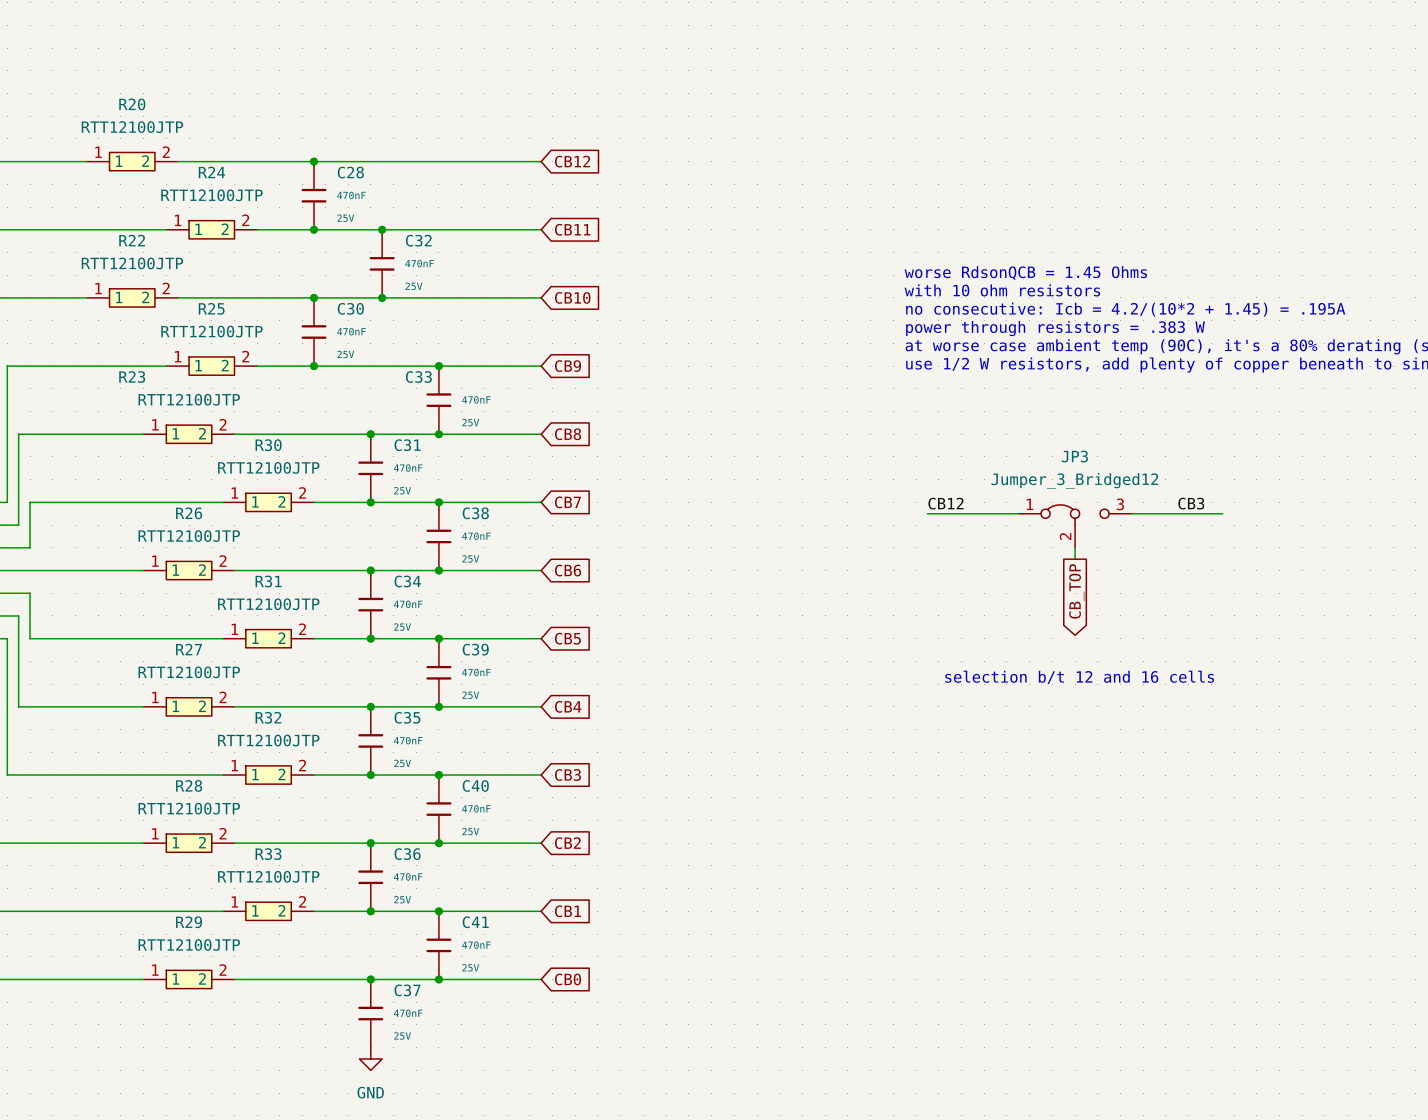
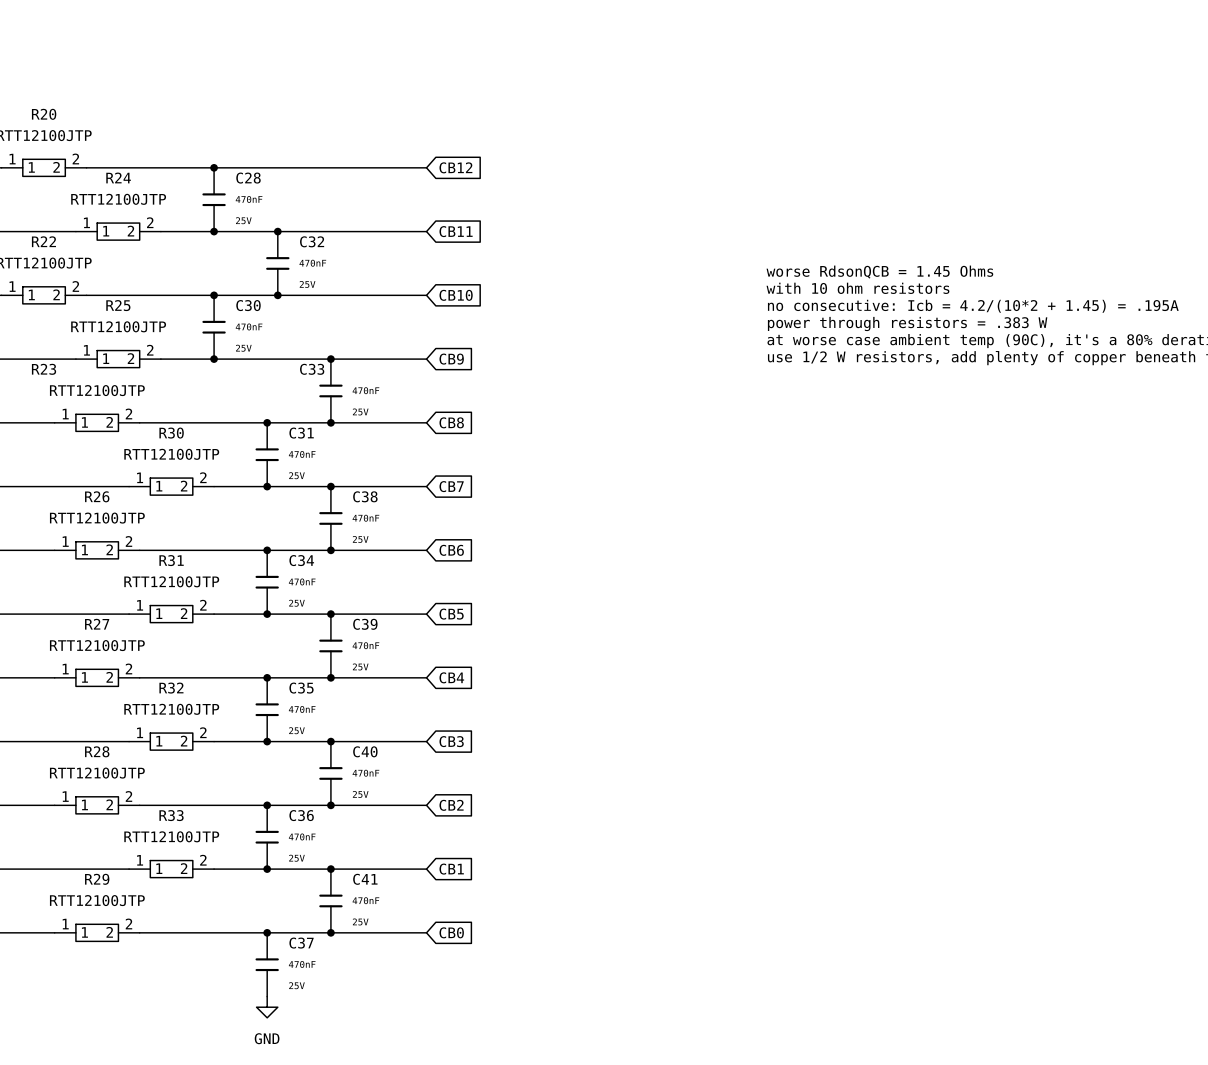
label: CB12 (946, 503) -> none
label: CB3 (1191, 503) -> none
wire: (927, 513) (1018, 513) -> none
wire: (1131, 513) (1222, 513) -> none
JP3: Jumper_3_Bridged12 (1075, 526) -> none
wire: (1075, 547) (1075, 559) -> none
global label: CB_TOP (1076, 591) -> none
text: selection b/t 12 and 16 cells (1079, 677) -> none

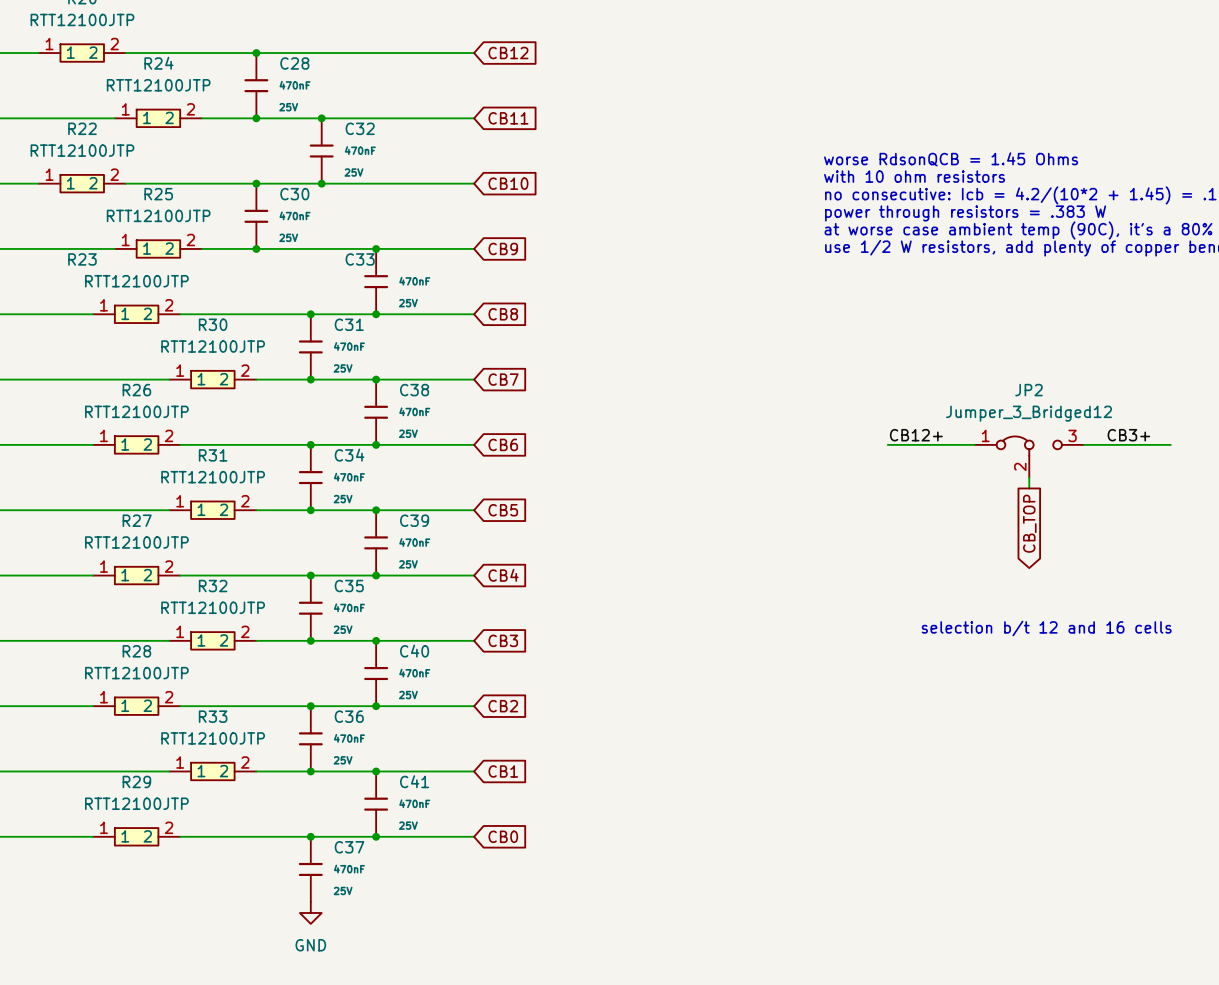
label: none -> CB12+ (916, 435)
label: none -> CB3+ (1128, 435)
wire: none -> (887, 444) (974, 444)
wire: none -> (1083, 444) (1170, 444)
JP2: none -> Jumper_3_Bridged12 (1029, 457)
wire: none -> (1029, 477) (1029, 488)
global label: none -> CB_TOP (1029, 523)
text: none -> selection b/t 12 and 16 cells (1046, 628)

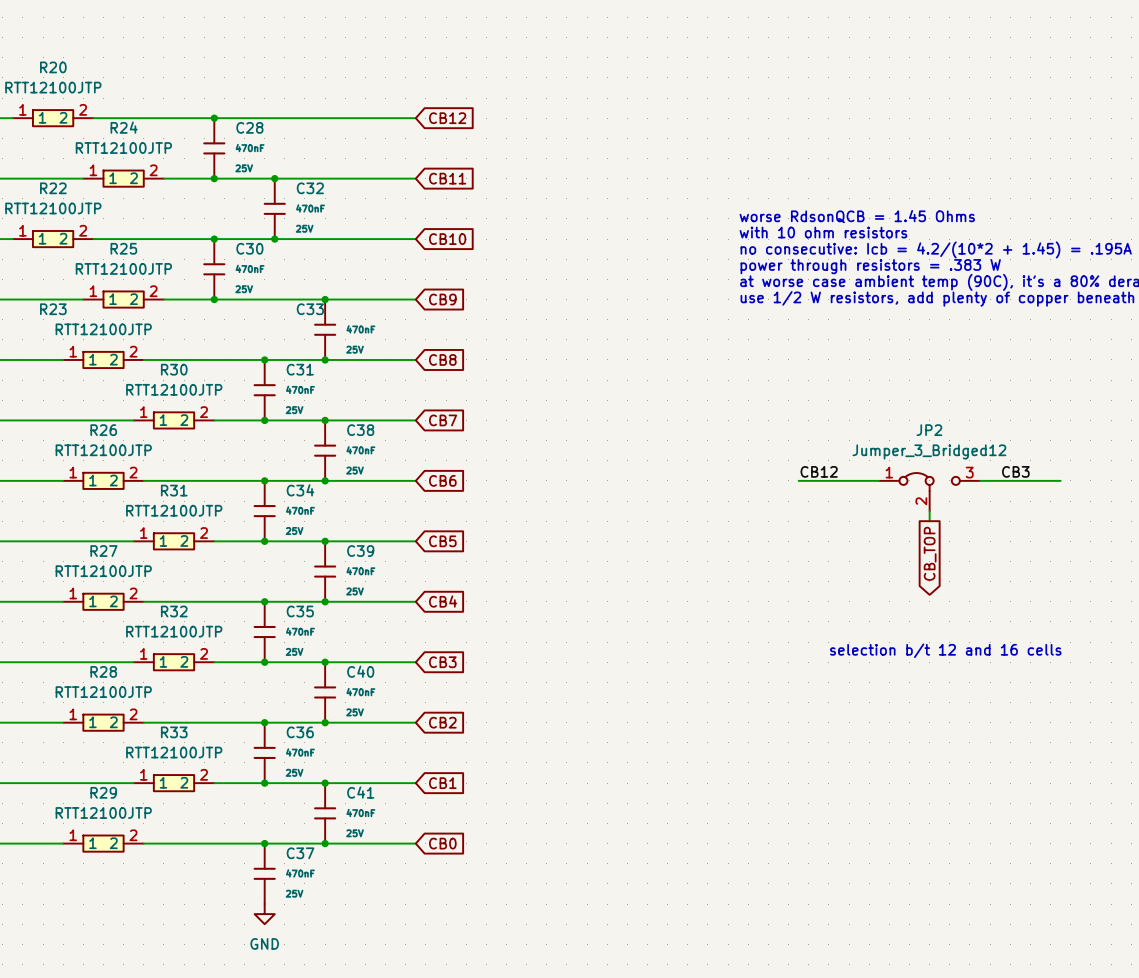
label: CB12+ (916, 435) -> CB12 (819, 471)
label: CB3+ (1128, 435) -> CB3 (1015, 471)

